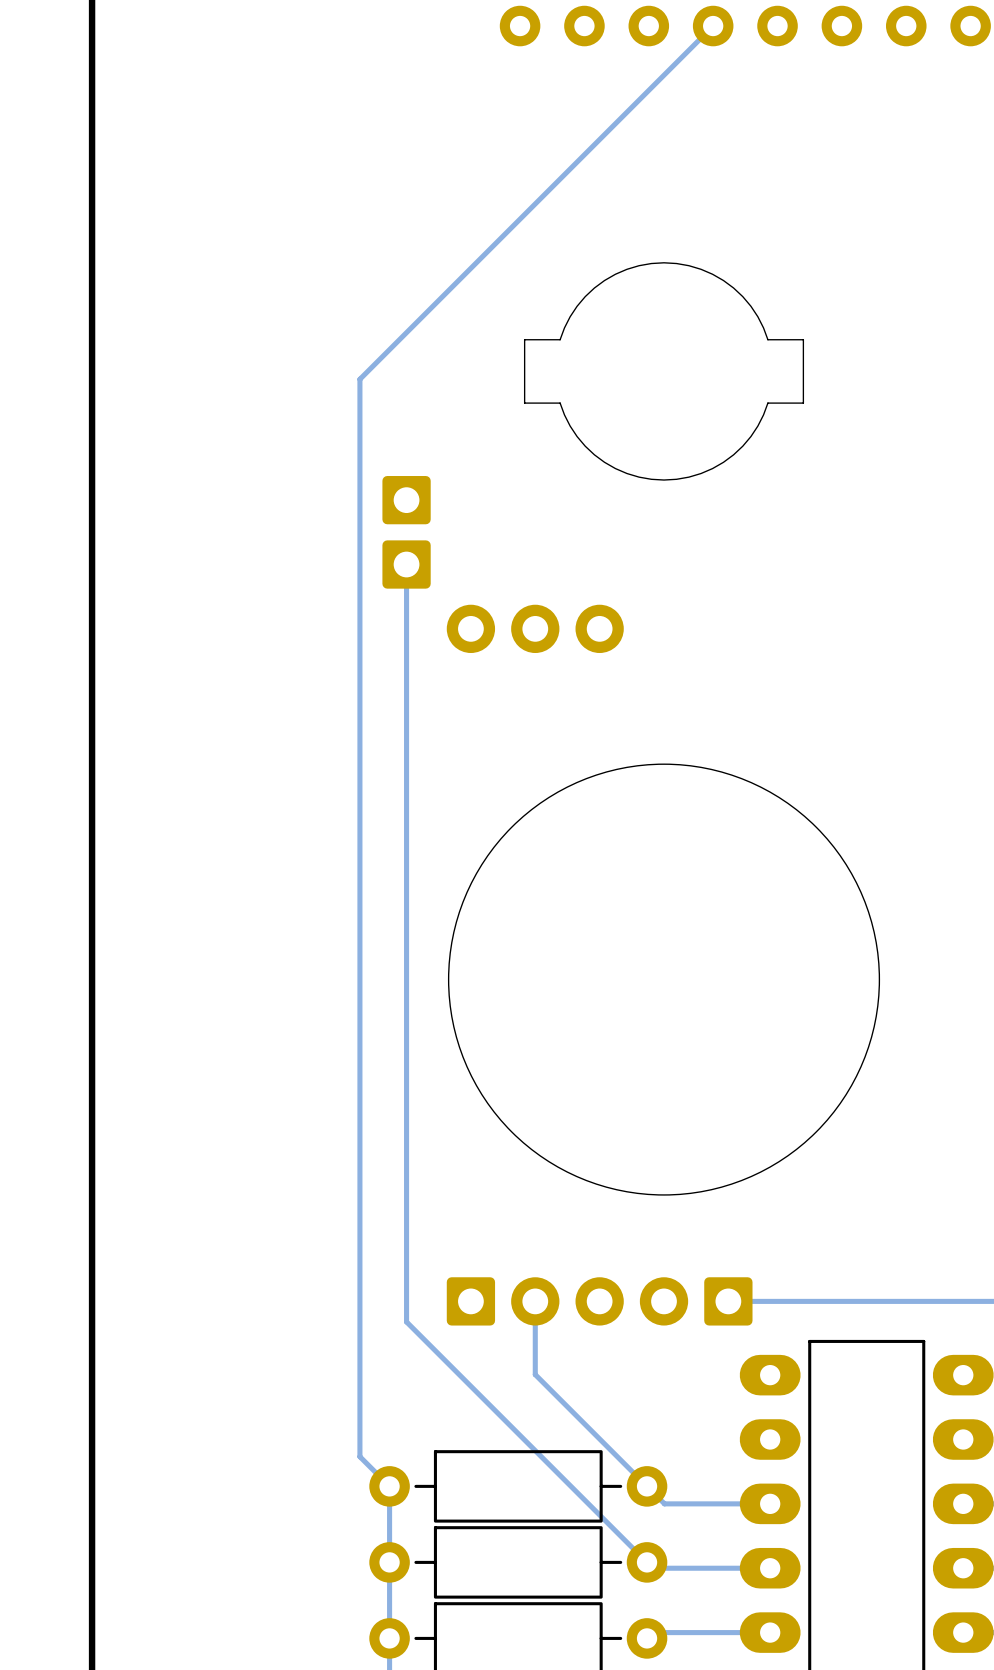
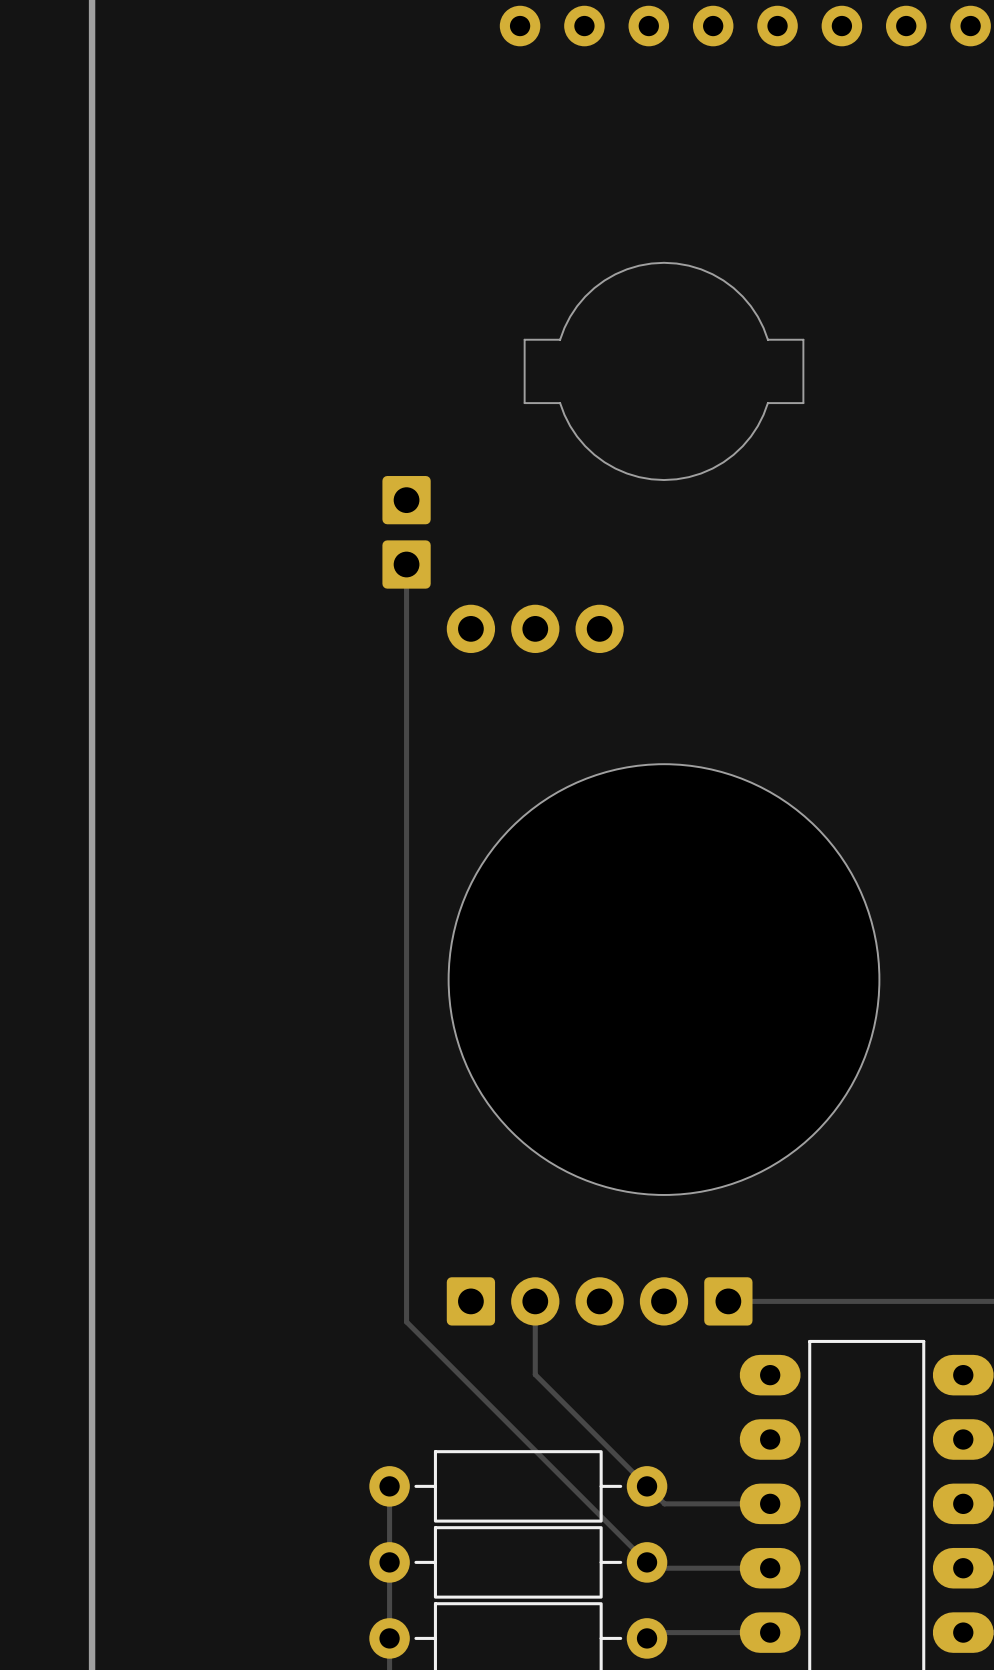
track: (713, 26) (359, 379) (359, 1456) (389, 1486) -> none

